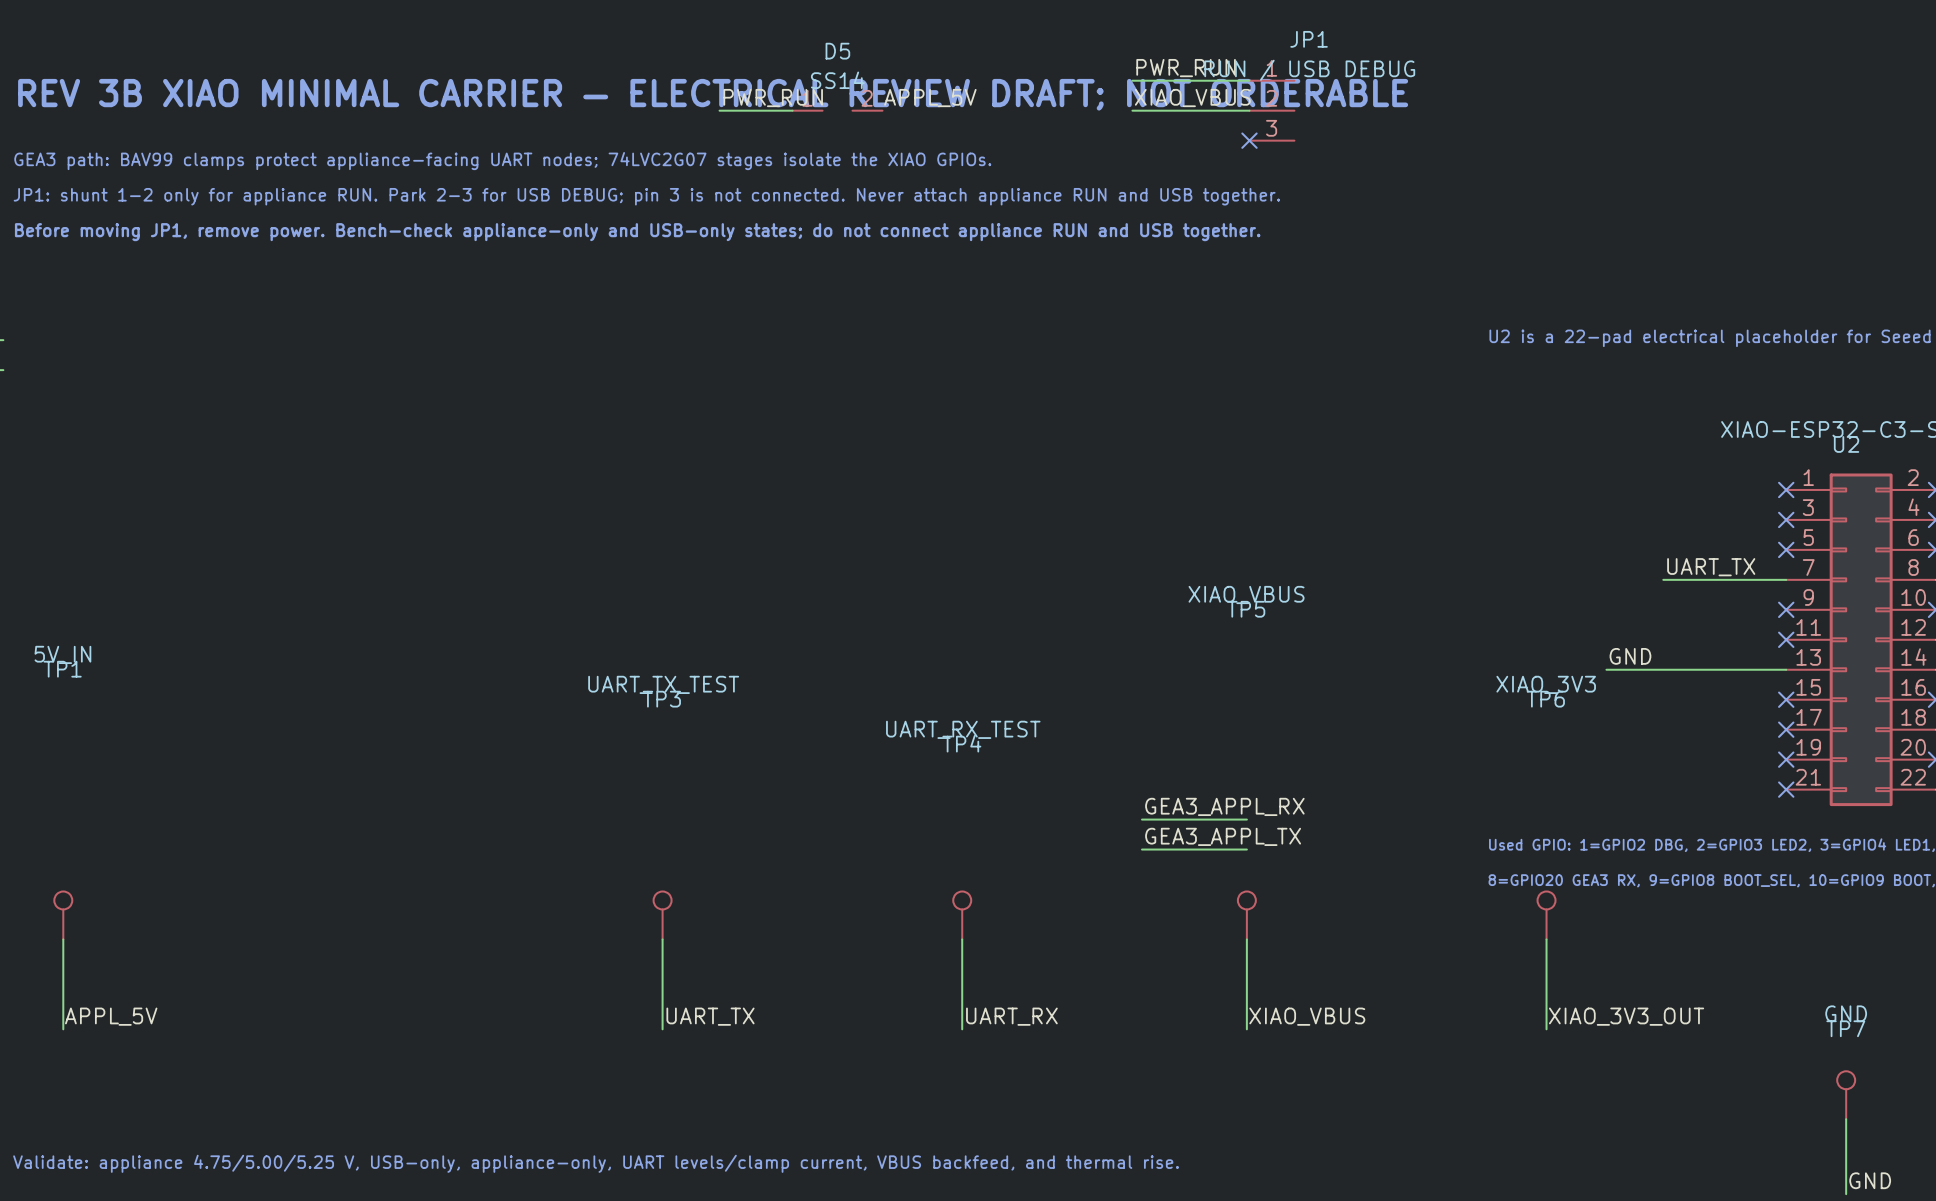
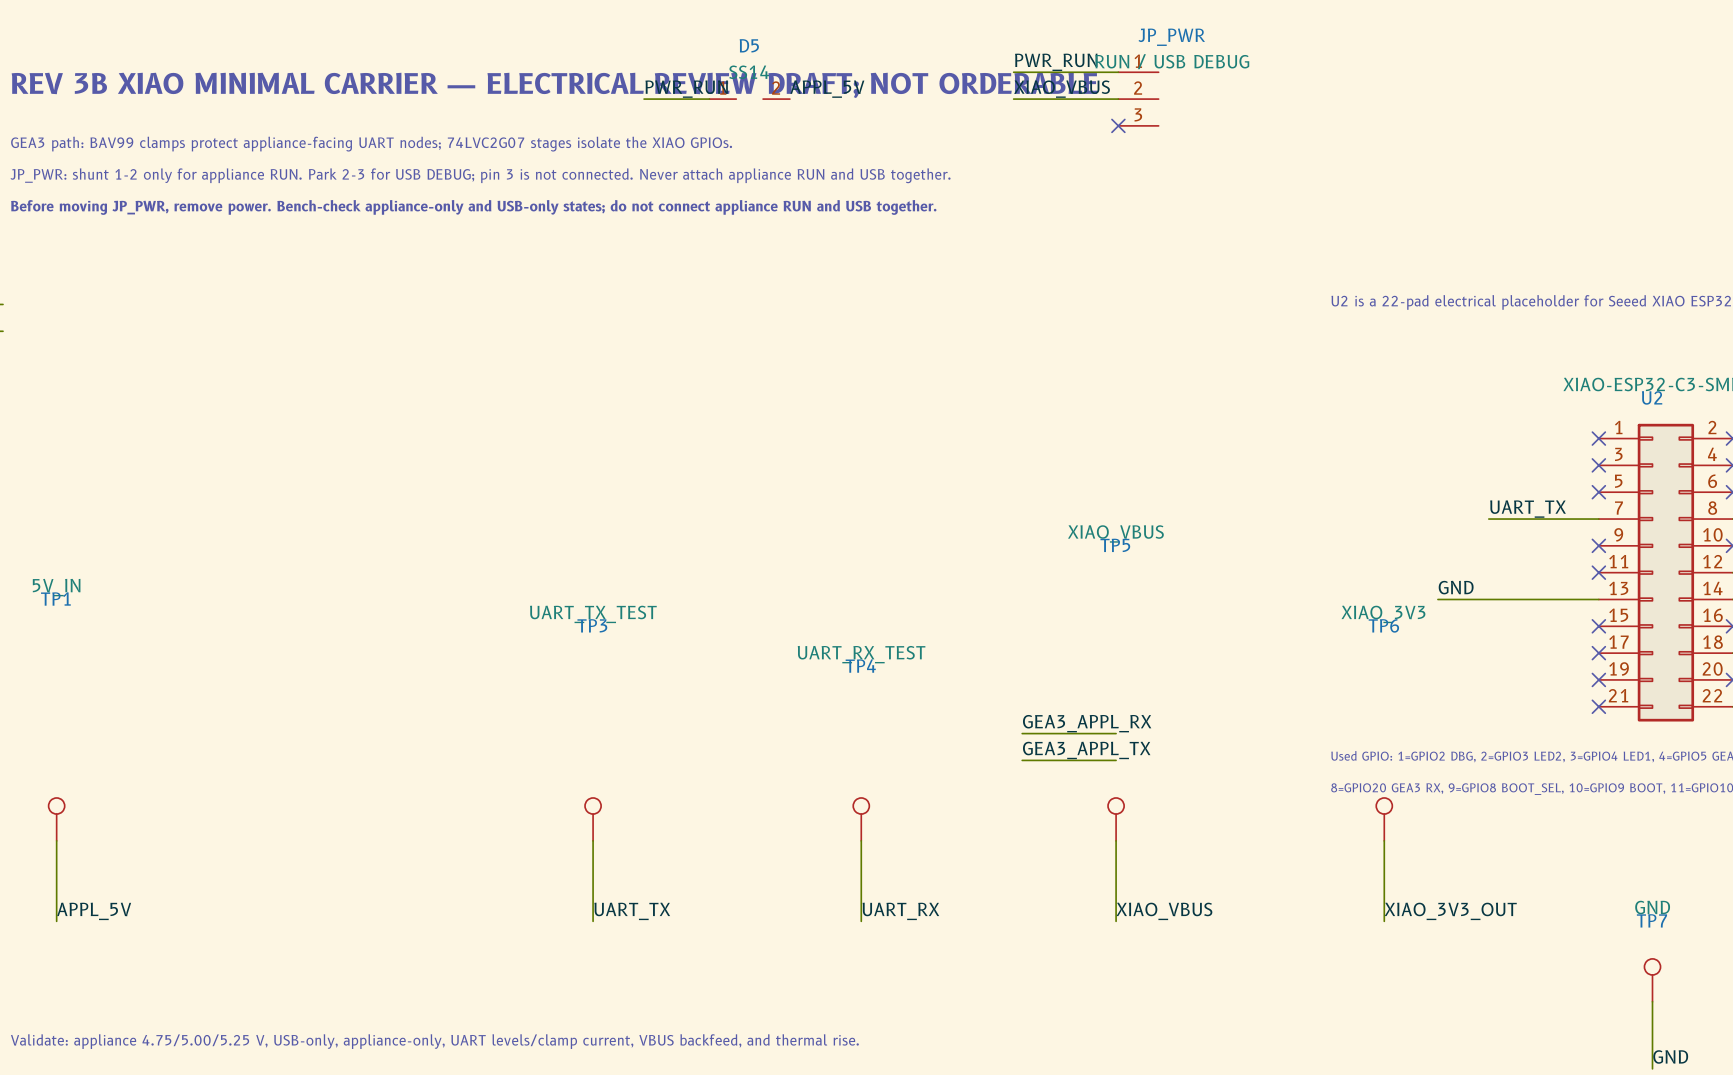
JP1 name: JP1 (1309, 39) -> JP_PWR (1171, 37)
text: JP1: shunt 1-2 only for appliance RUN. Park 2-3 for USB DEBUG; pin 3 is not connected. Never attach appliance RUN and USB together. (646, 196) -> JP_PWR: shunt 1-2 only for appliance RUN. Park 2-3 for USB DEBUG; pin 3 is not connected. Never attach appliance RUN and USB together. (480, 175)
text: Before moving JP1, remove power. Bench-check appliance-only and USB-only states; do not connect appliance RUN and USB together. (637, 232) -> Before moving JP_PWR, remove power. Bench-check appliance-only and USB-only states; do not connect appliance RUN and USB together. (473, 207)

